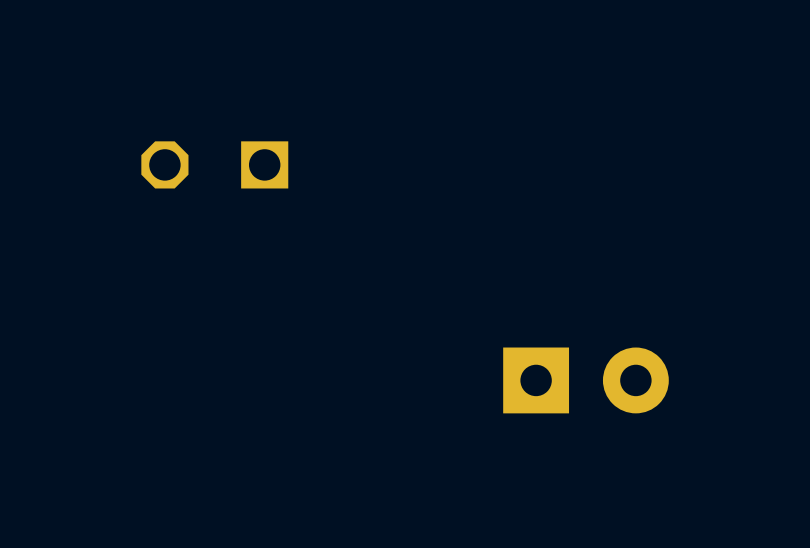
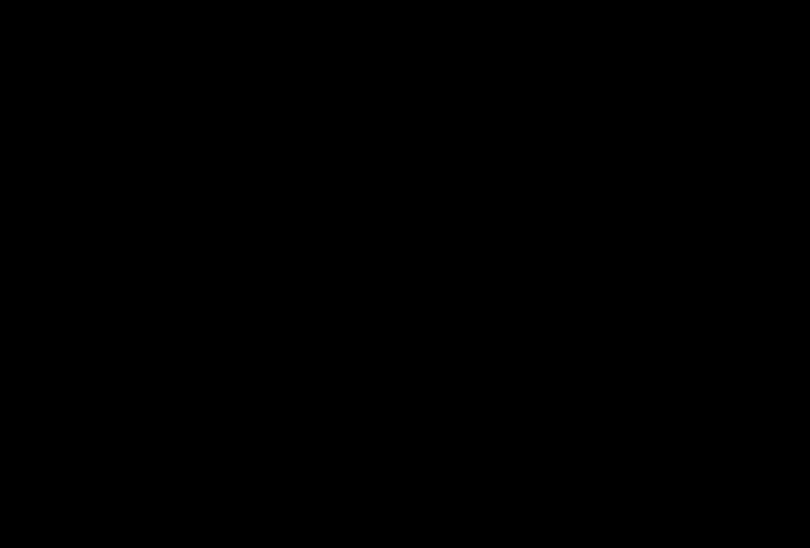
part: (214, 164) -> none
part: (585, 380) -> none

